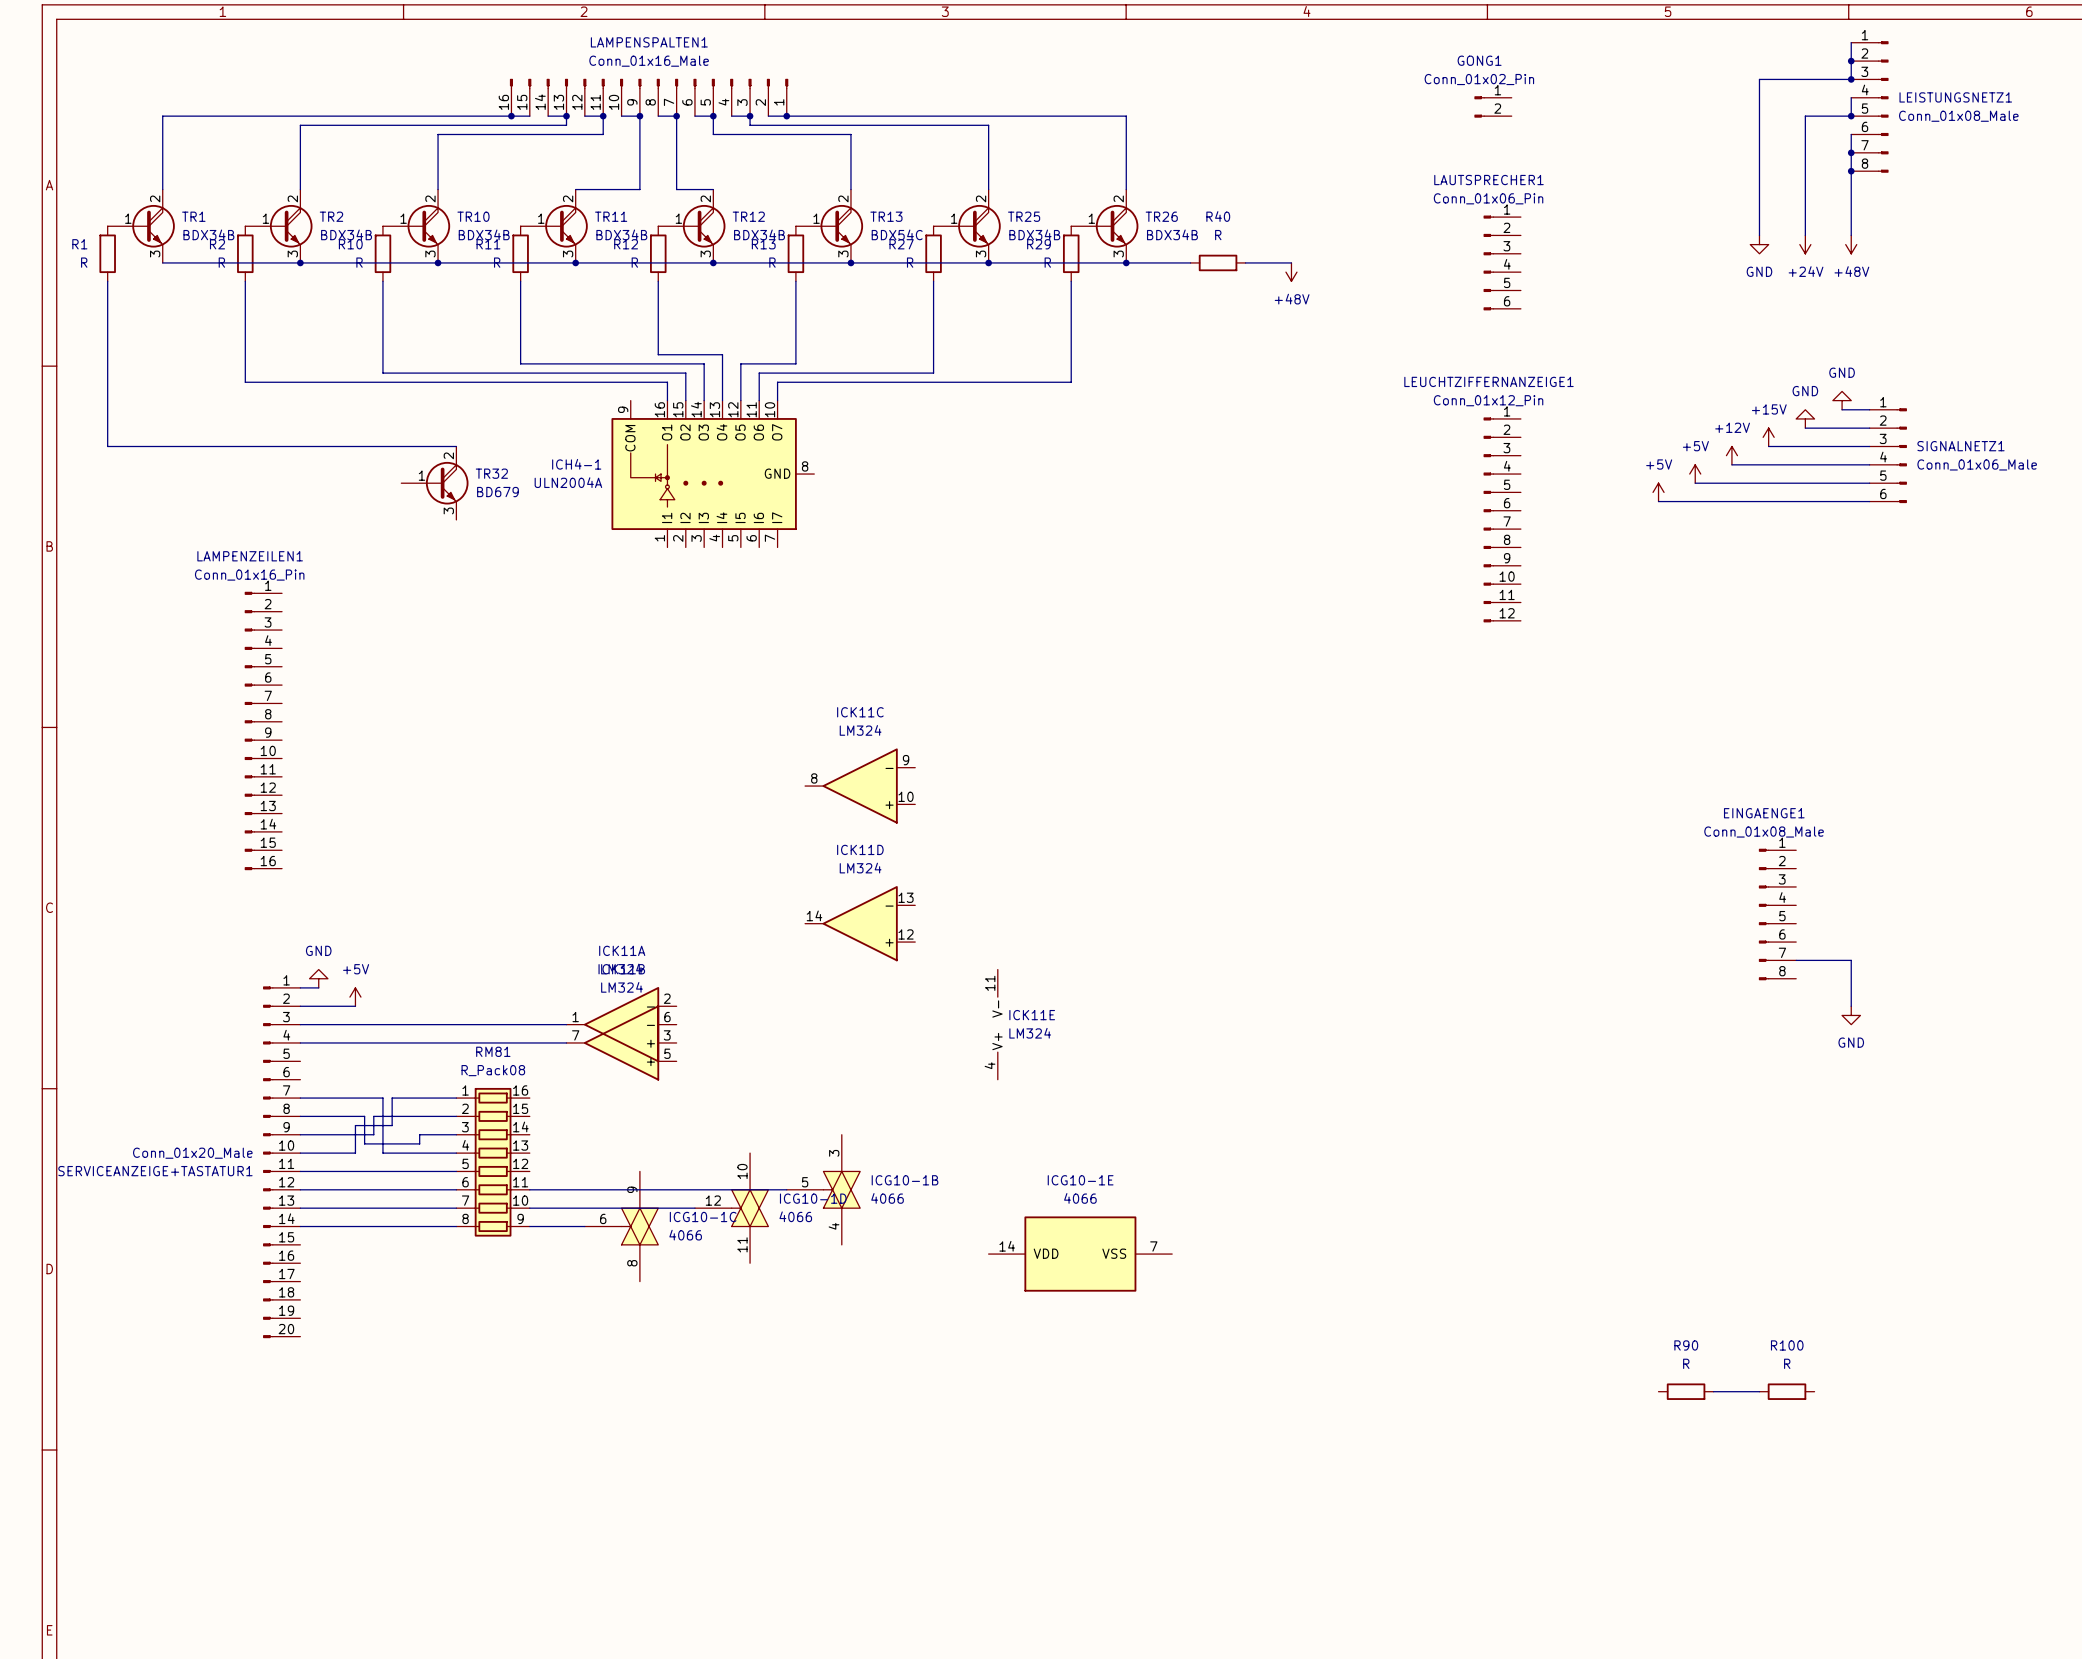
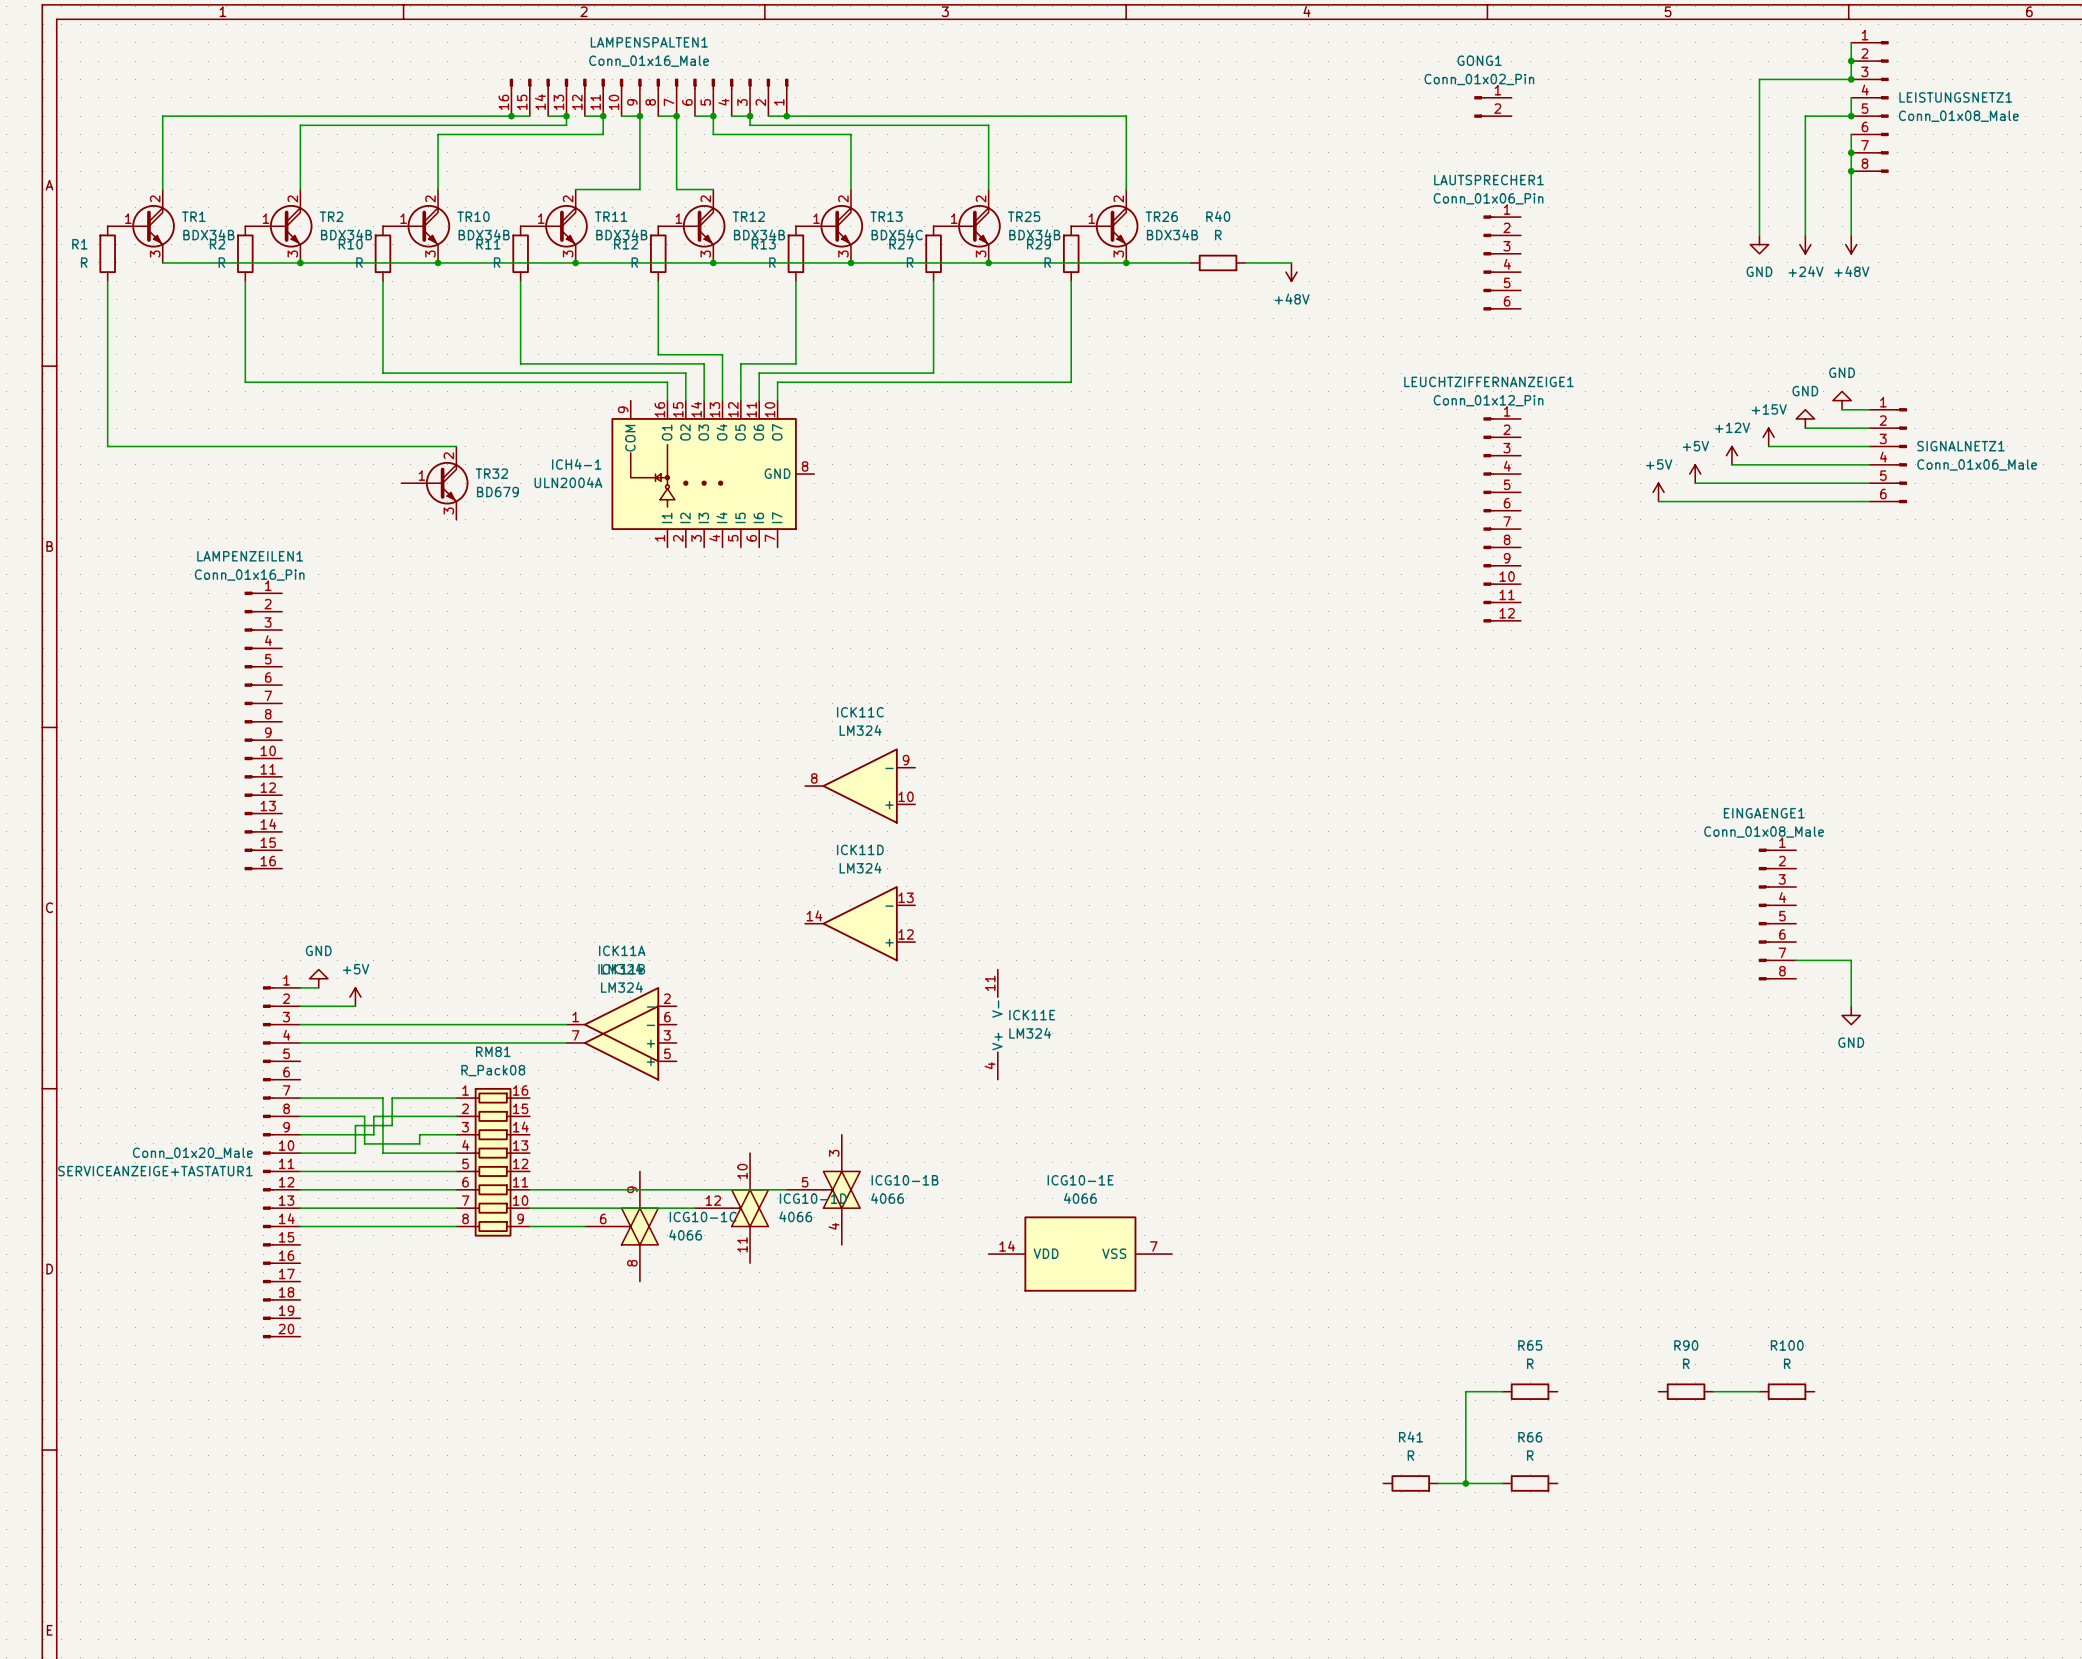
wire: none -> (1502, 1391) (1465, 1391) (1465, 1483)
R65: none -> R (1530, 1391)
R41: none -> R (1410, 1483)
wire: none -> (1438, 1483) (1502, 1483)
junction: none -> (1465, 1483)
R66: none -> R (1530, 1483)

